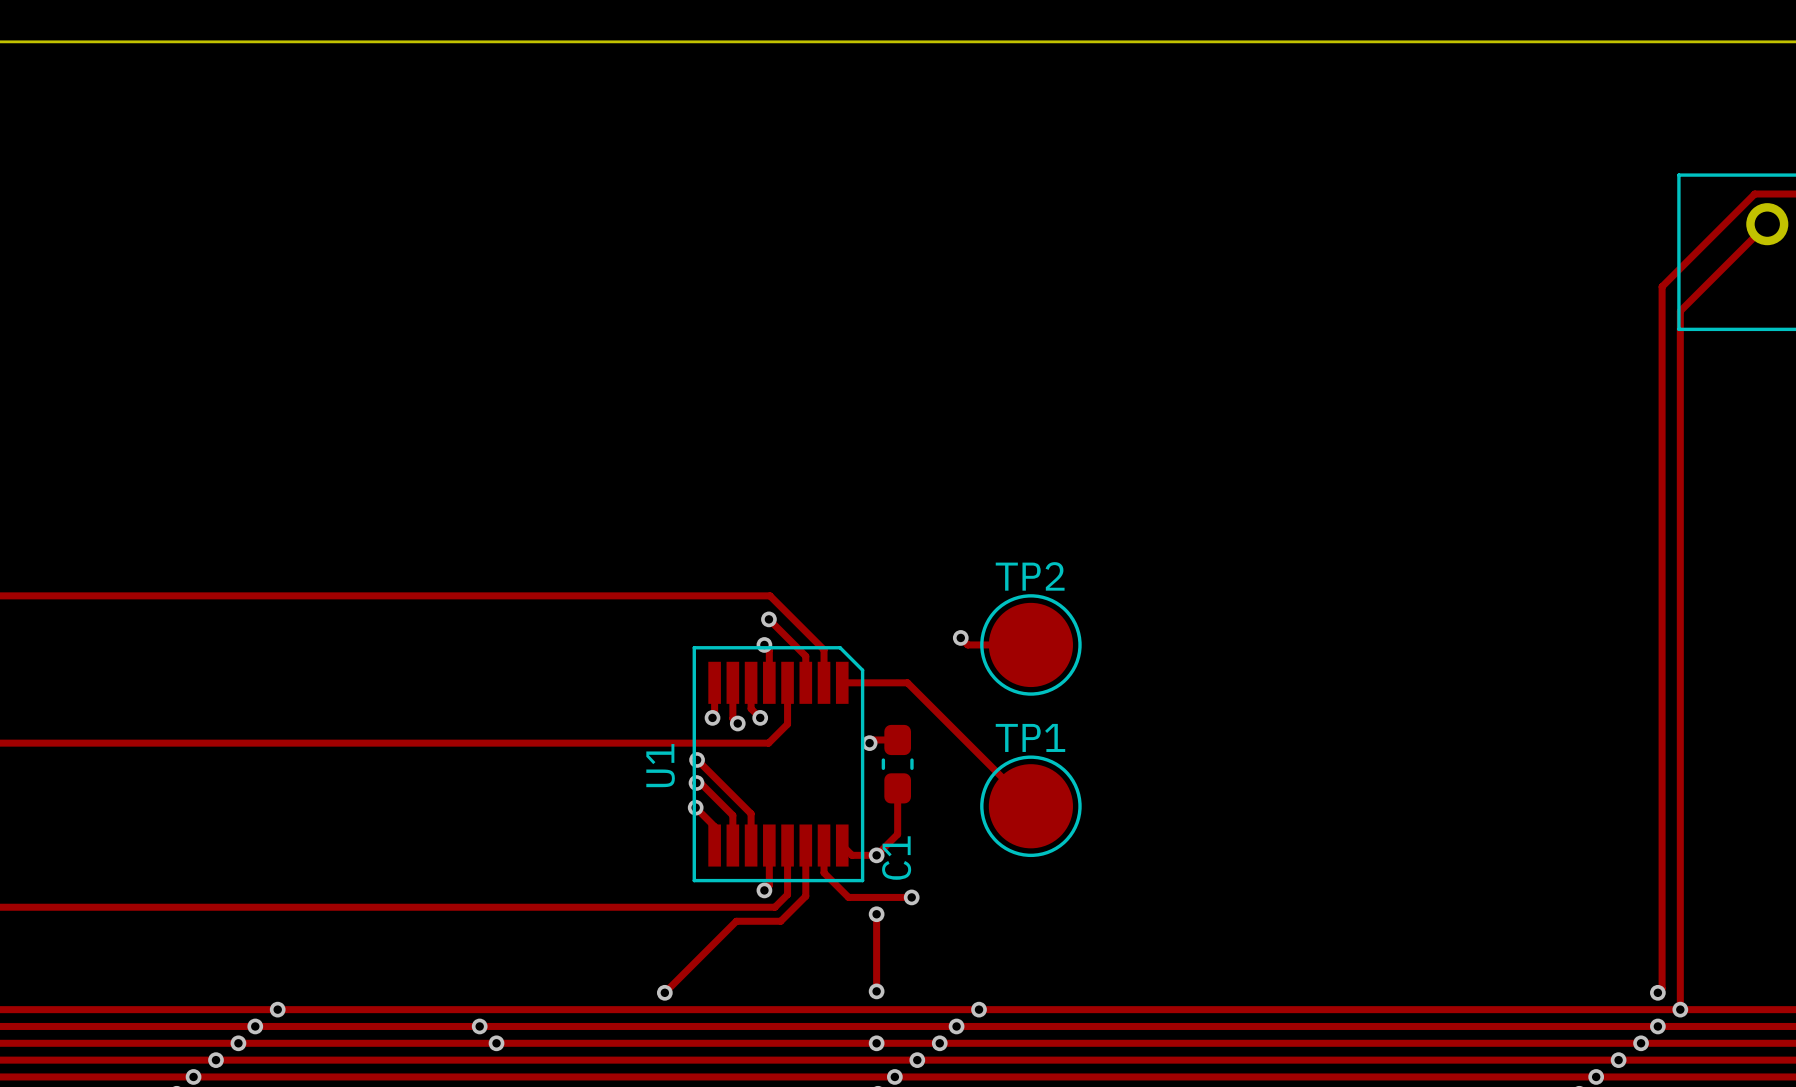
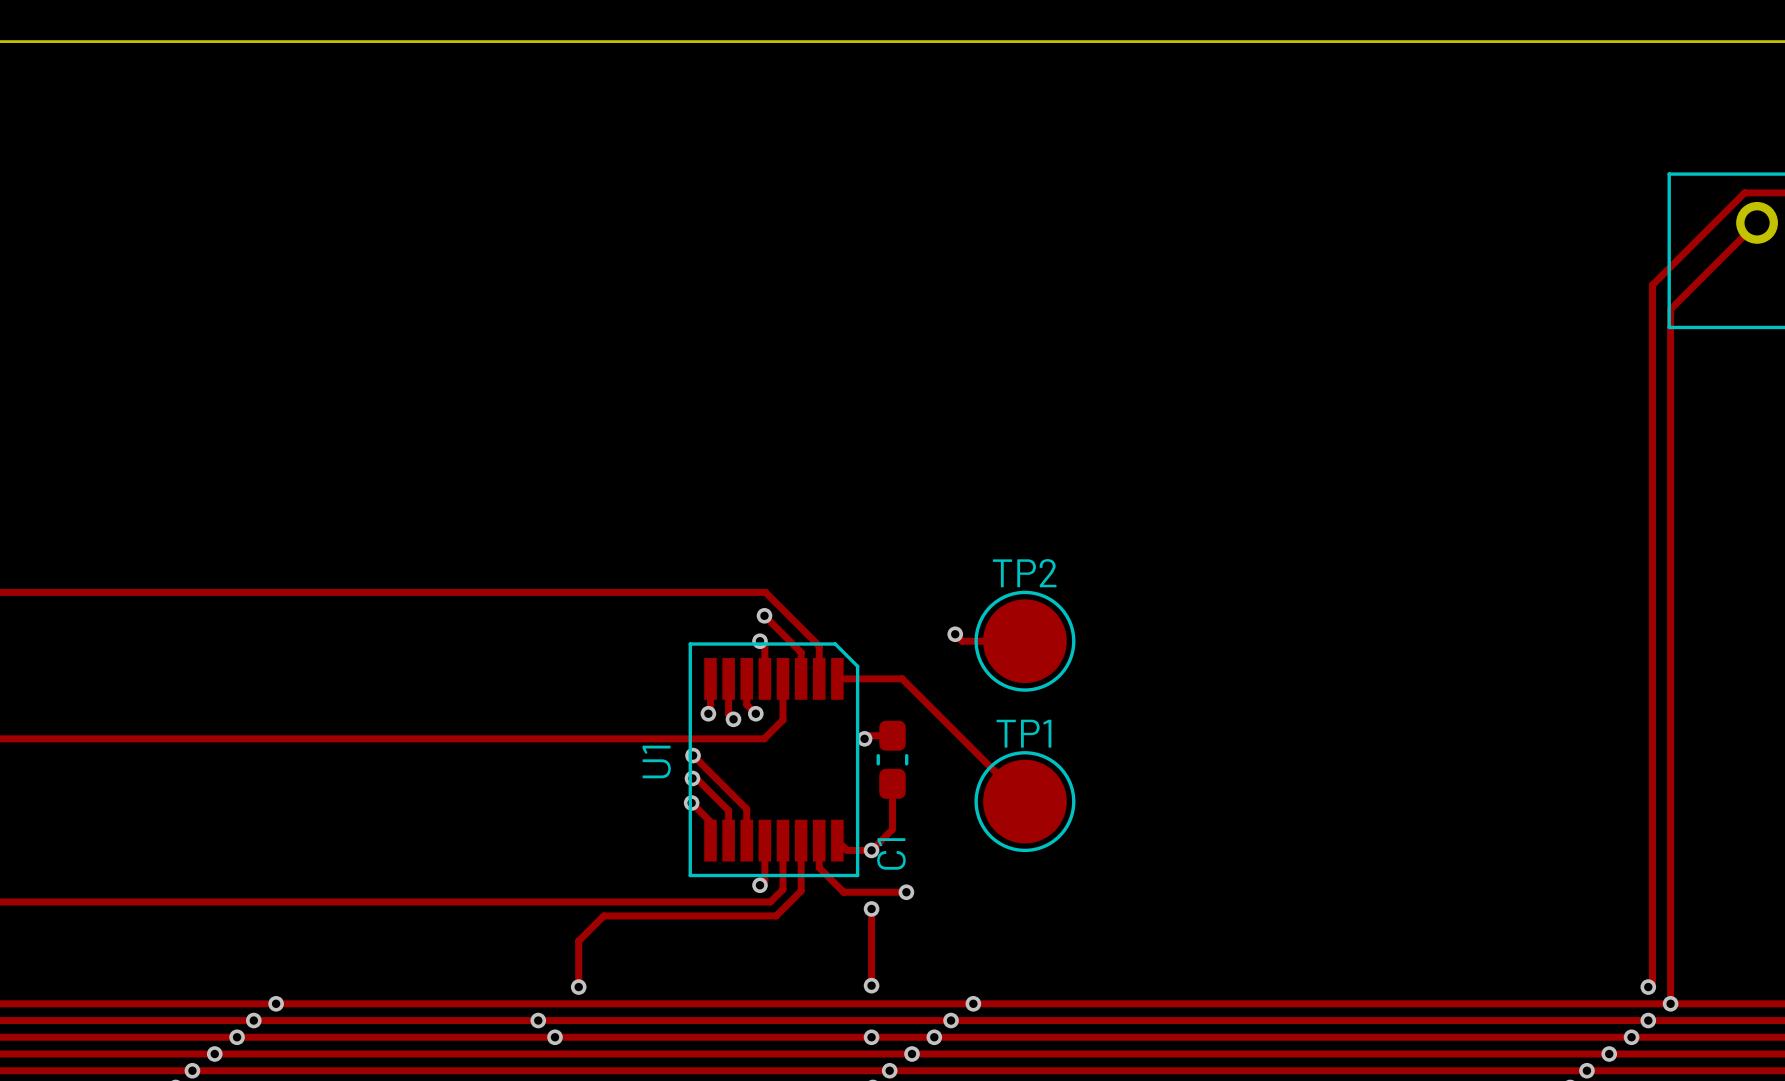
track: (736, 921) (664, 992) -> (732, 915) (603, 915) (578, 941) (578, 987)
via: none -> (578, 987)
via: (664, 992) -> none
via: (479, 1026) -> none
via: none -> (538, 1020)
via: (496, 1043) -> none
via: none -> (555, 1037)

